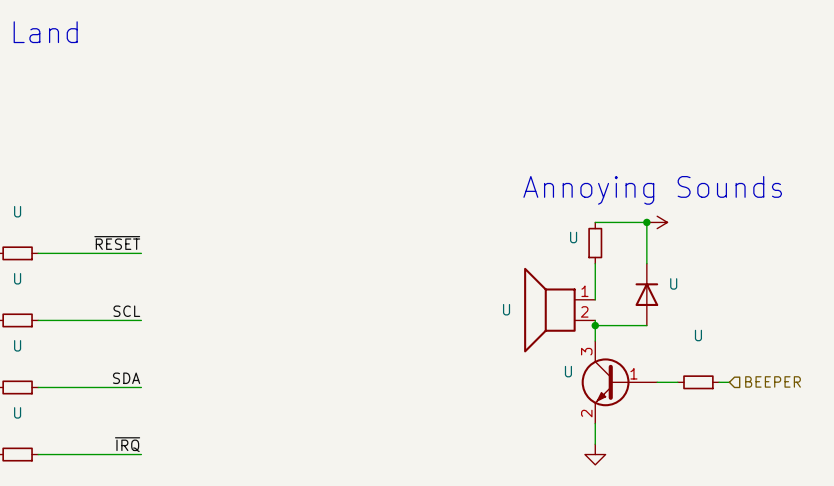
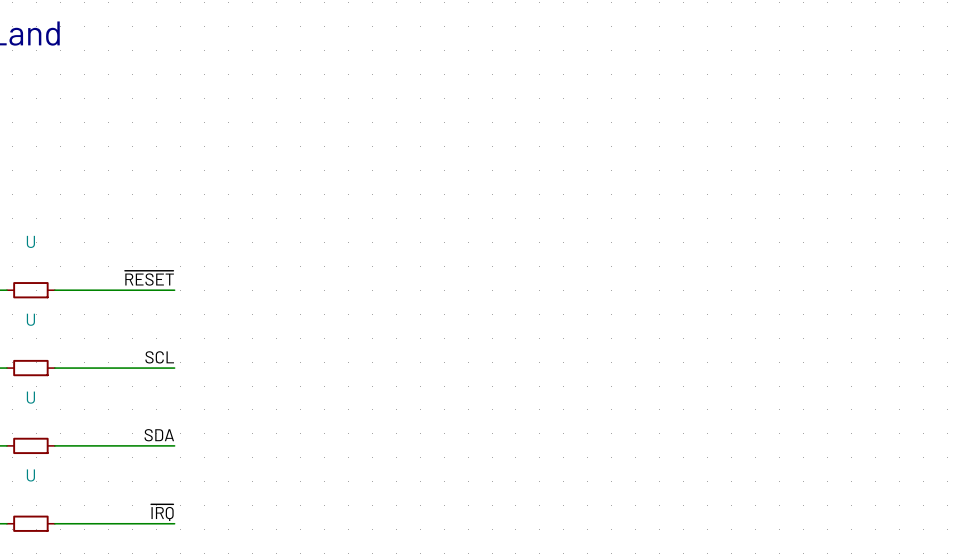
text: Annoying Sounds (652, 190) -> none
wire: (595, 222) (646, 222) (646, 263) -> none
junction: (646, 222) -> none
power symbol: (657, 222) -> none
U: (595, 243) -> none
wire: (595, 263) (595, 299) -> none
U: (646, 294) -> none
U: (559, 310) -> none
wire: (595, 320) (595, 341) -> none
wire: (595, 325) (646, 325) -> none
junction: (595, 325) -> none
hierarchical label: BEEPER (773, 381) -> none
U: (619, 382) -> none
wire: (657, 382) (677, 382) -> none
U: (698, 382) -> none
wire: (719, 382) (729, 382) -> none
wire: (595, 423) (595, 444) -> none
power symbol: (595, 454) -> none

